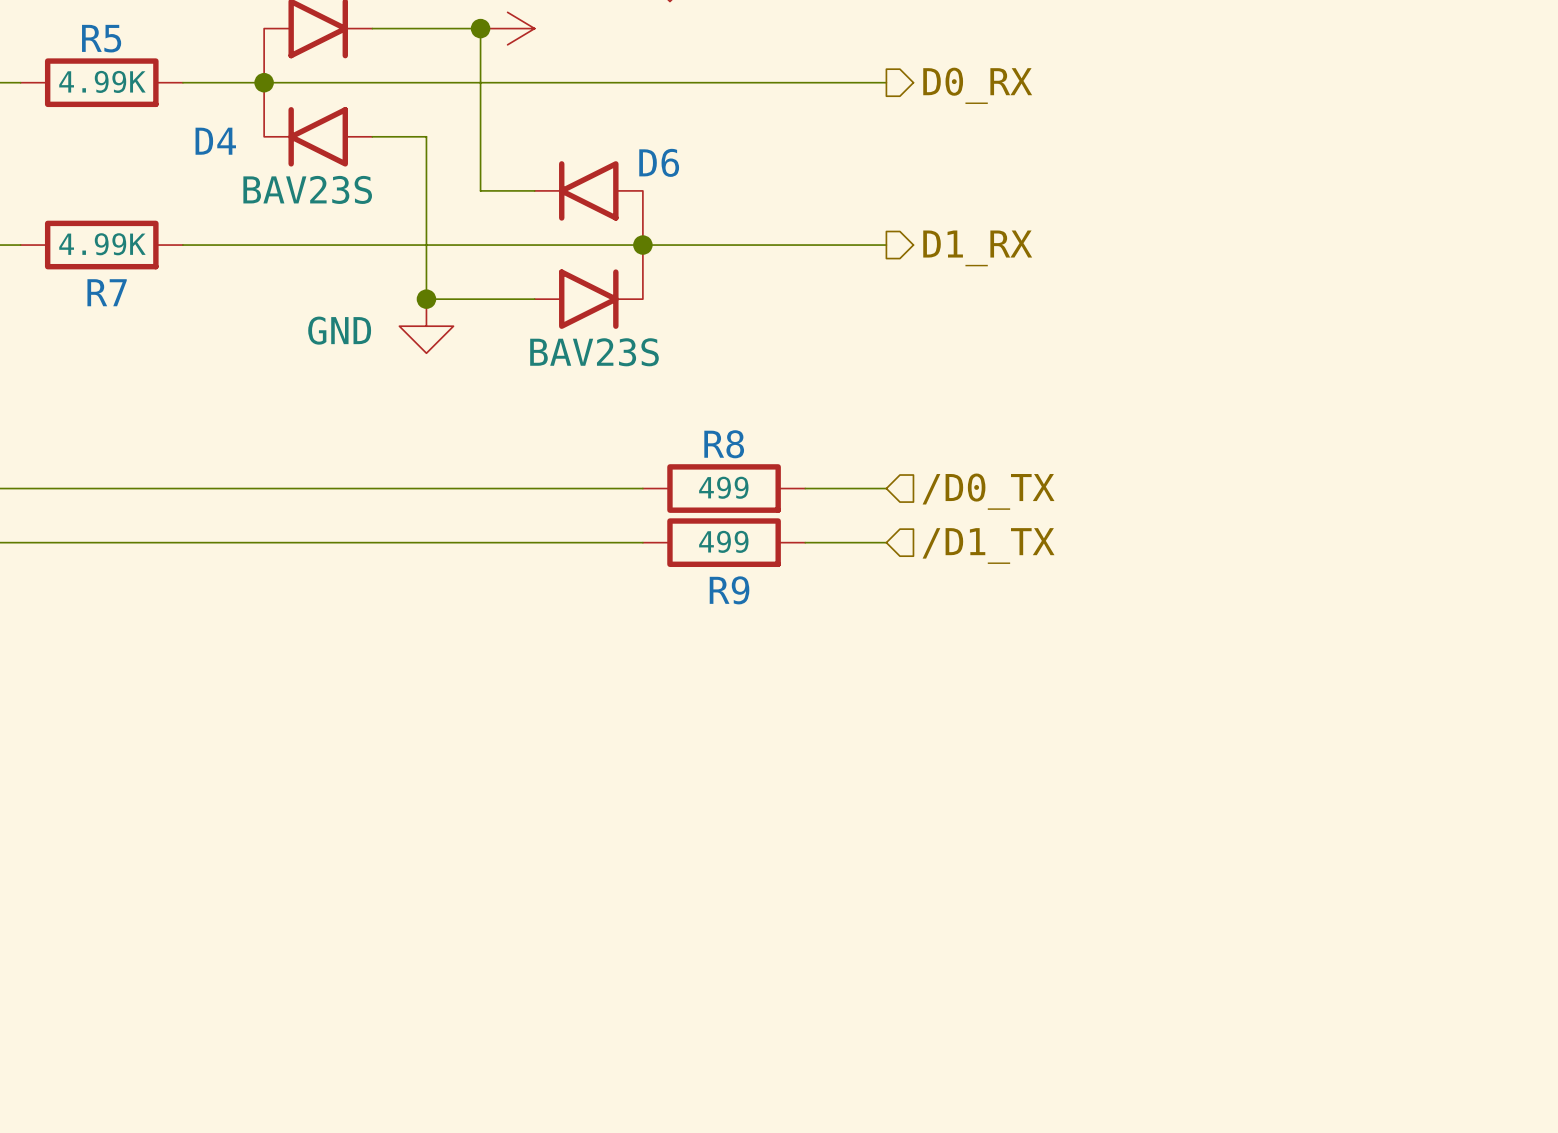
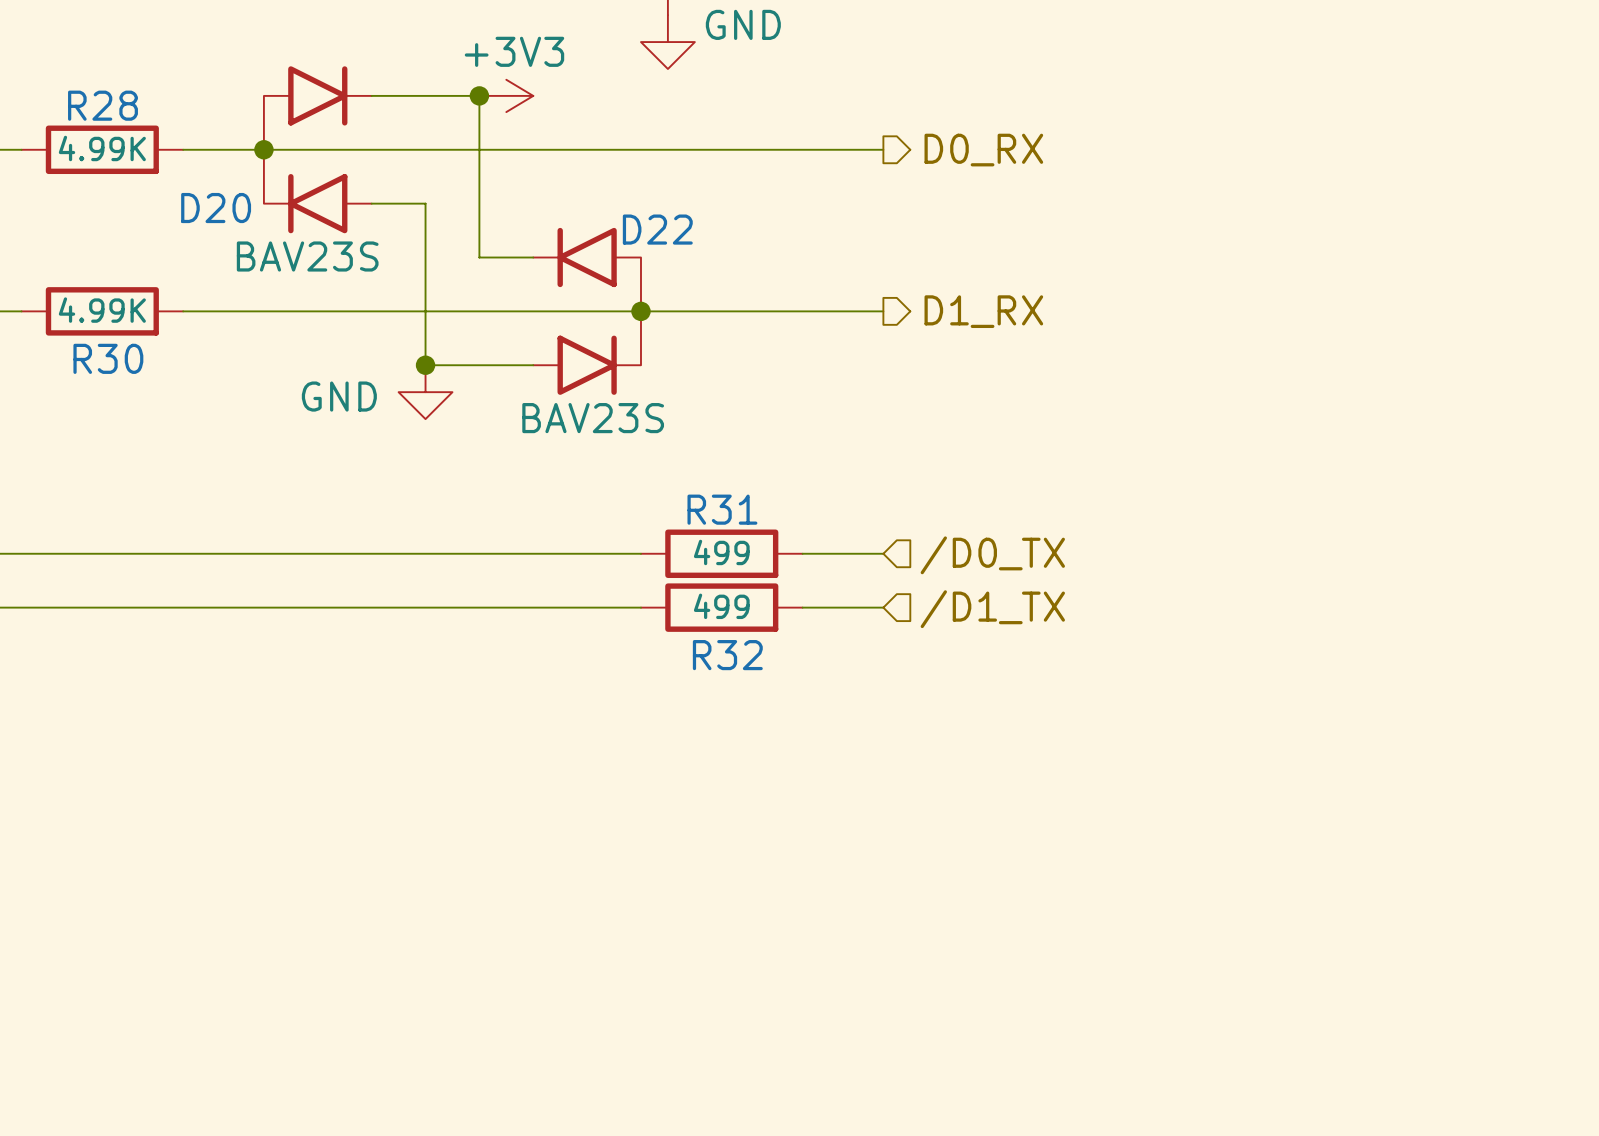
R5 name: R5 (101, 38) -> R28 (102, 105)
D4 name: D4 (215, 141) -> D20 (216, 208)
D6 name: D6 (659, 162) -> D22 (657, 229)
R7 name: R7 (107, 292) -> R30 (108, 358)
R8 name: R8 (724, 444) -> R31 (722, 509)
R9 name: R9 (729, 590) -> R32 (727, 655)

